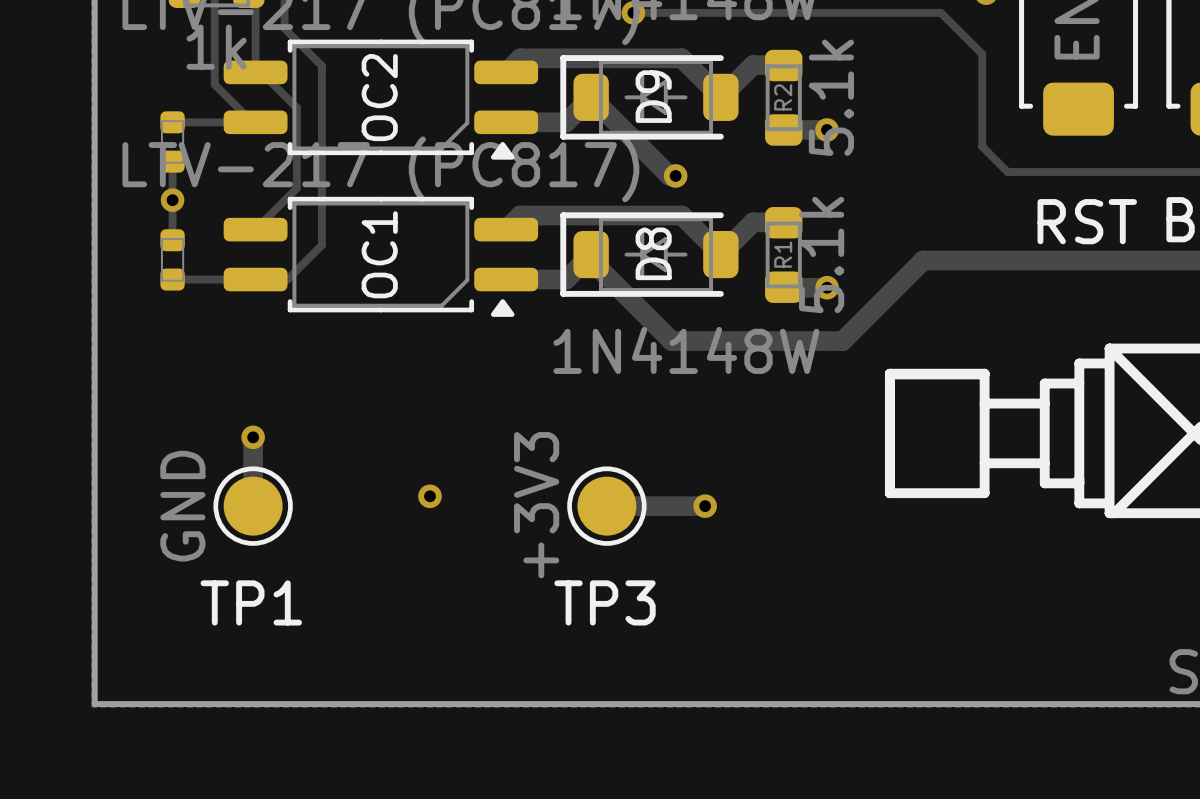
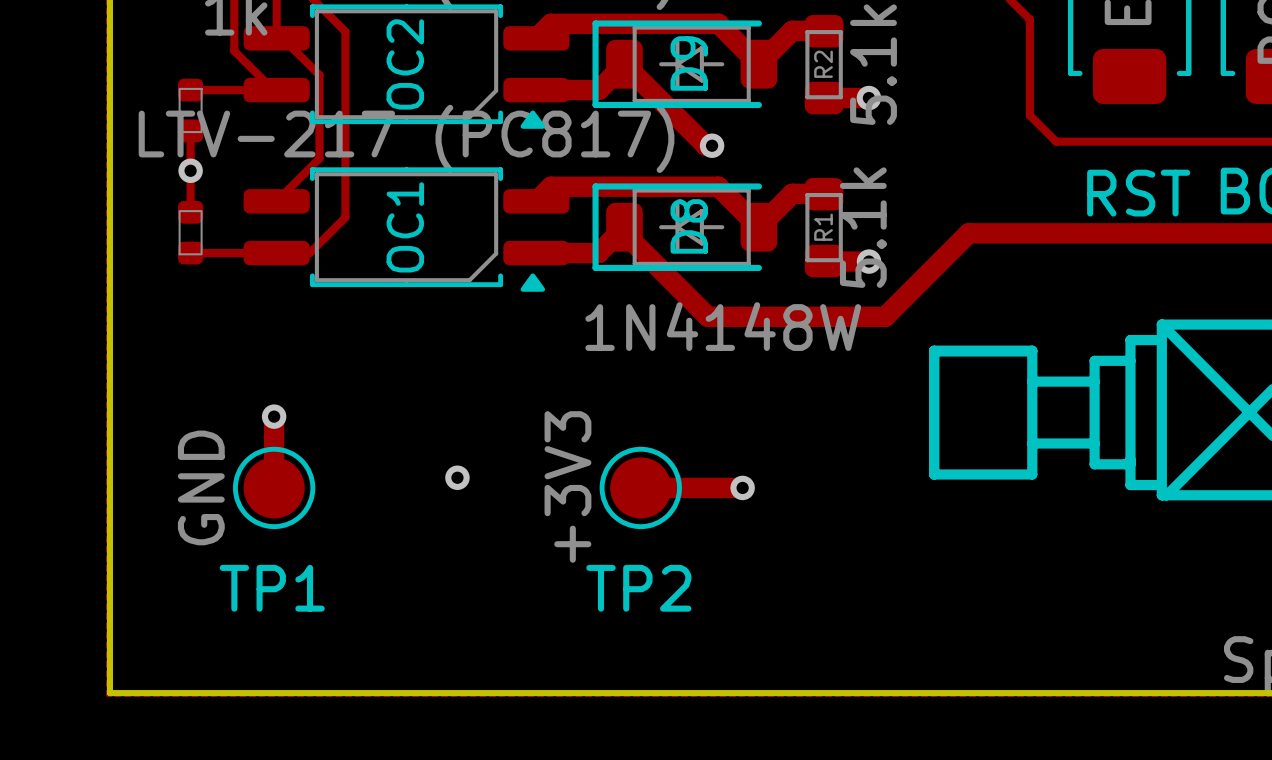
TP3 name: TP3 (605, 602) -> TP2 (638, 588)

